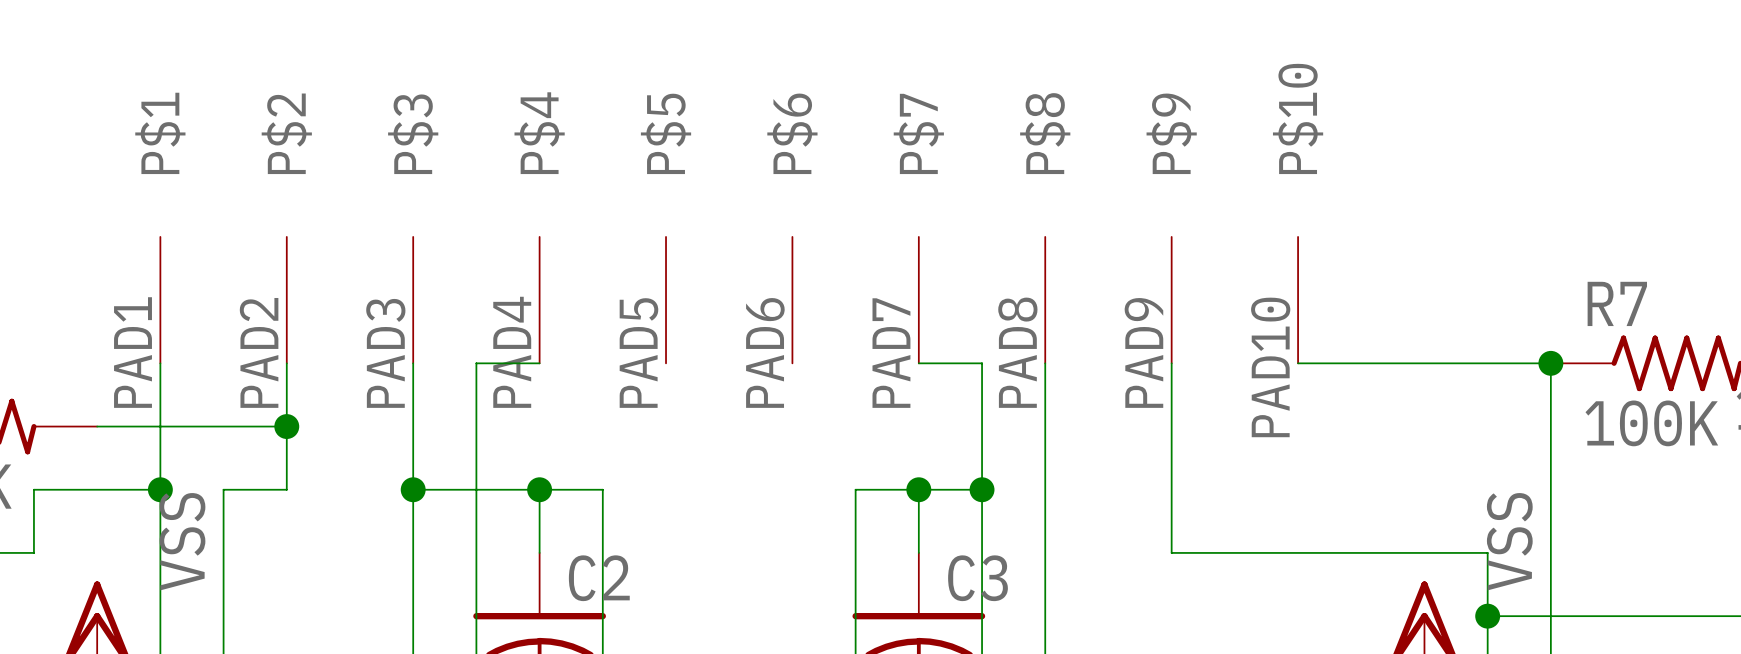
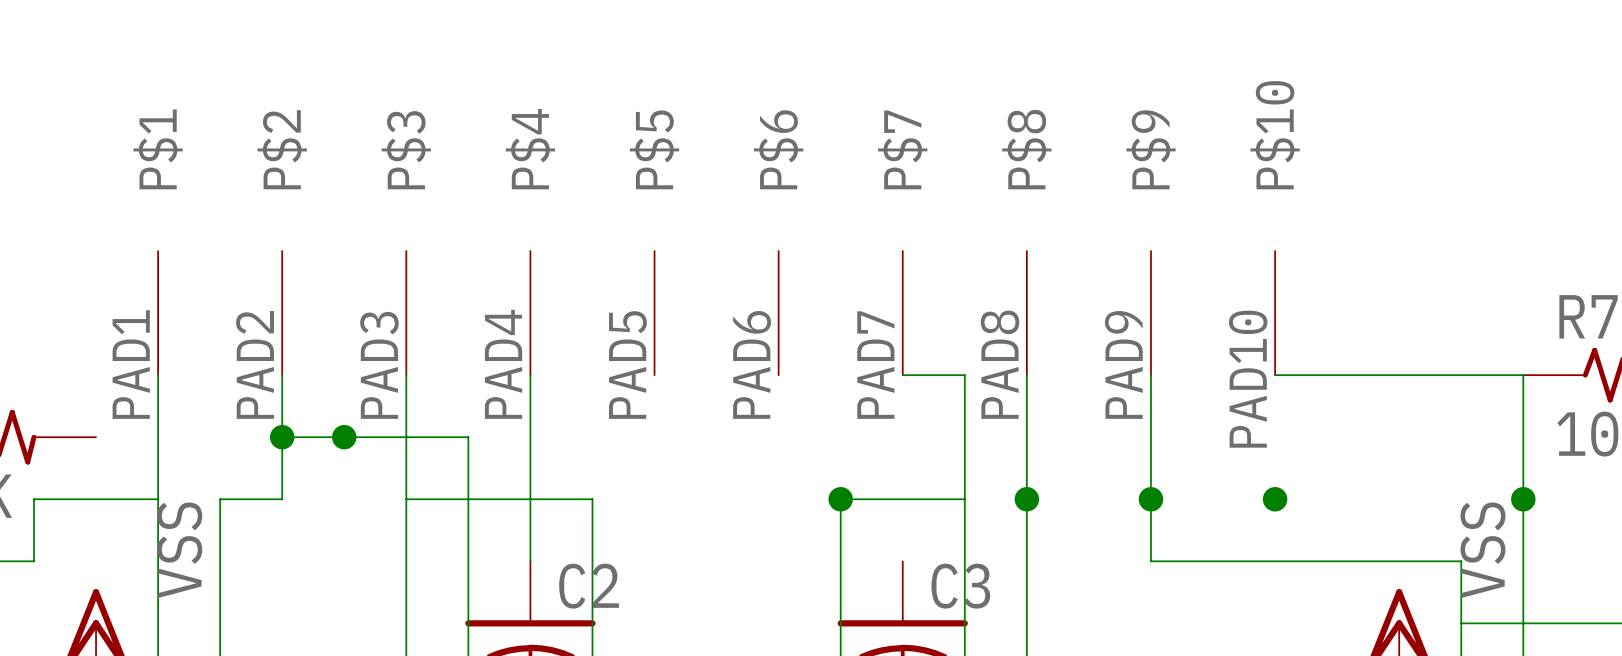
wire: (539, 363) (476, 363) (476, 426) -> (530, 375) (530, 499)
junction: (1550, 363) -> none
wire: (97, 426) (286, 426) -> (468, 437) (282, 437)
junction: (160, 489) -> none
junction position: (413, 489) -> (344, 437)
junction: (539, 489) -> none
junction: none -> (840, 499)
wire: (918, 489) (918, 552) -> none
junction: (918, 489) -> none
junction: (982, 489) -> none
junction: none -> (1026, 499)
junction: none -> (1150, 499)
junction: none -> (1275, 499)
junction: none -> (1523, 499)
junction: (1487, 616) -> none

